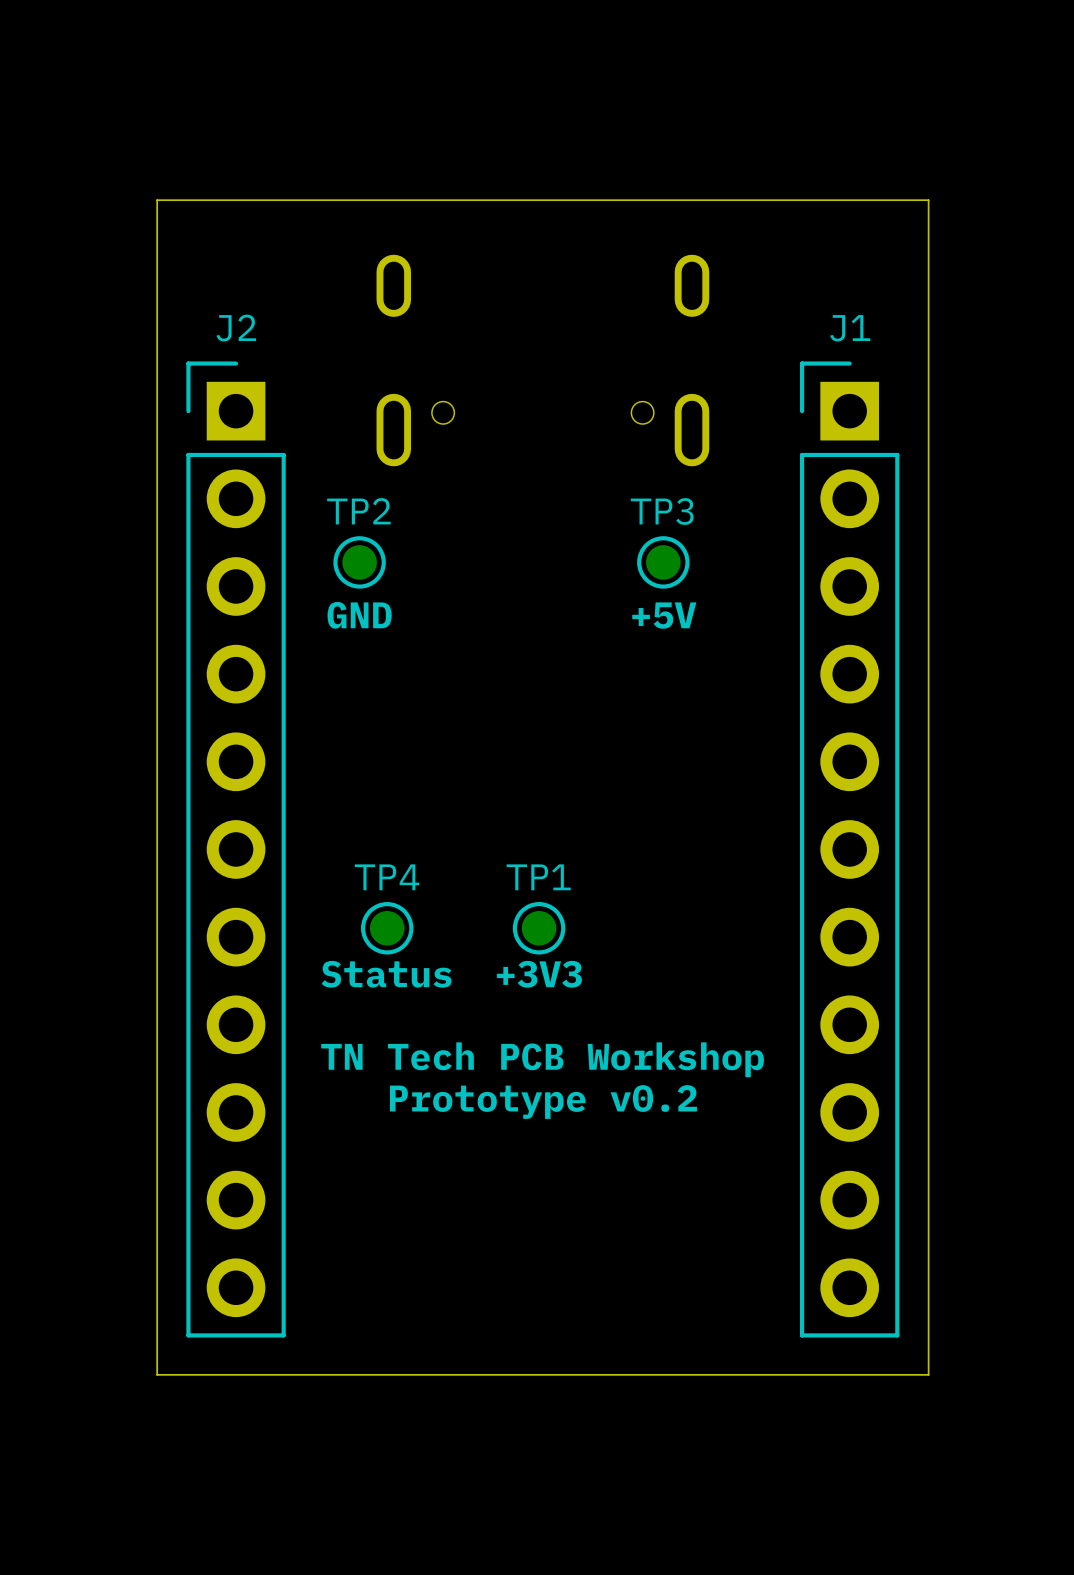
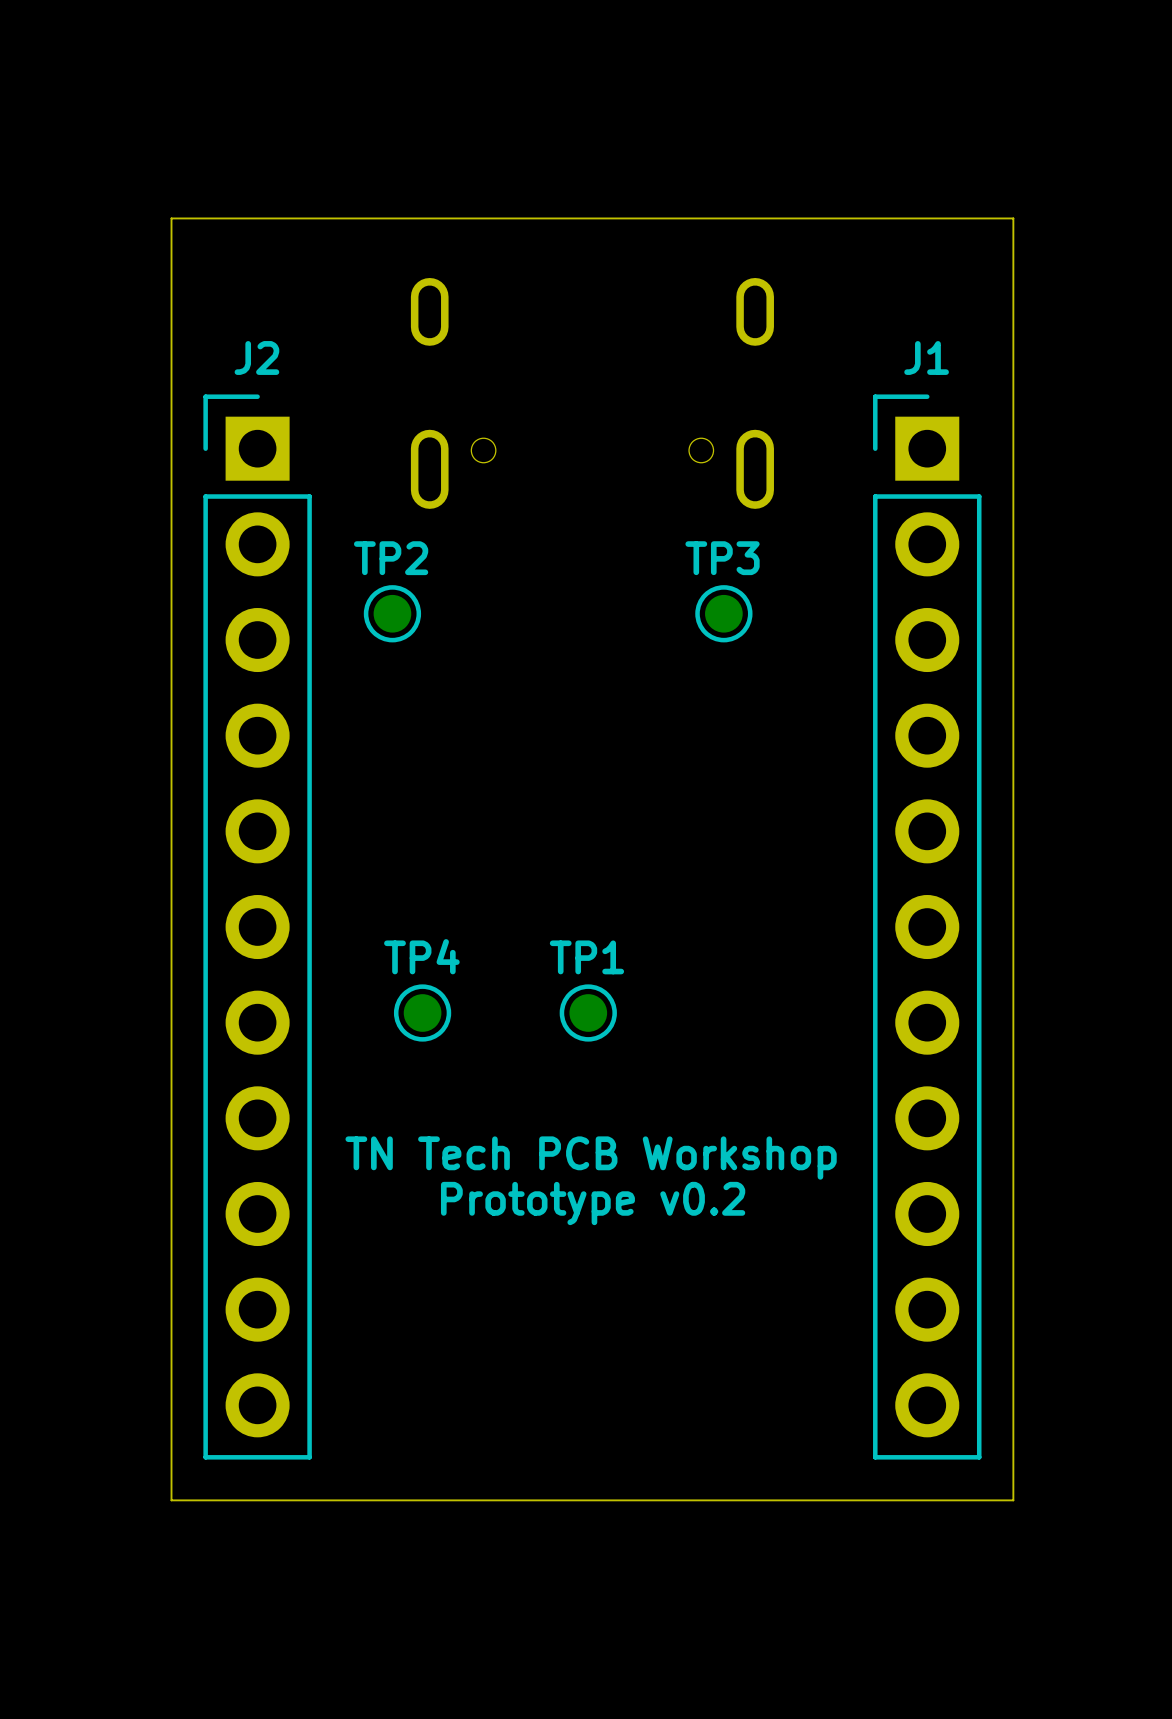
text: GND (359, 615) -> none
text: +5V (664, 615) -> none
text: Status (386, 974) -> none
text: +3V3 (539, 974) -> none

